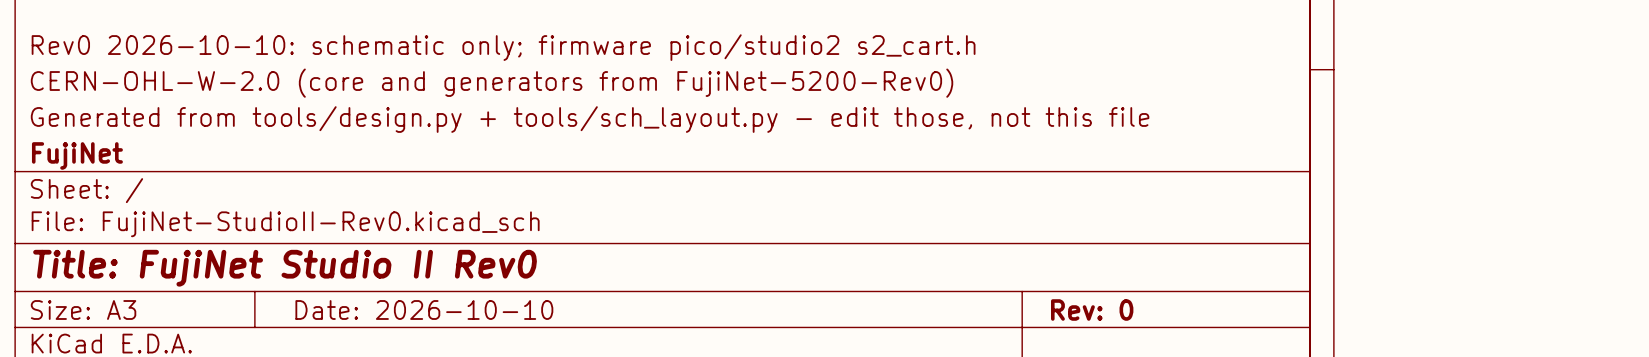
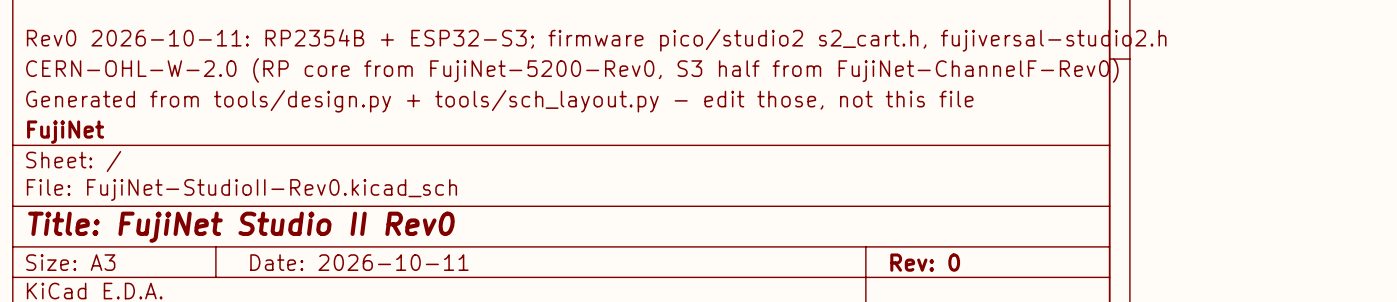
title block: Rev0 2026-10-10: schematic only; firmware pico/studio2 s2_cart.h (503, 47) -> Rev0 2026-10-11: RP2354B + ESP32-S3; firmware pico/studio2 s2_cart.h, fujiversal-studio2.h (596, 40)
title block: CERN-OHL-W-2.0 (core and generators from FujiNet-5200-Rev0) (492, 83) -> CERN-OHL-W-2.0 (RP core from FujiNet-5200-Rev0, S3 half from FujiNet-ChannelF-Rev0) (572, 70)
title block: Date: 2026-10-10 (424, 310) -> Date: 2026-10-11 (359, 262)

